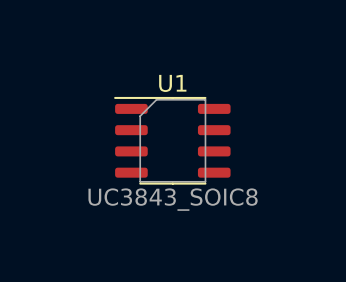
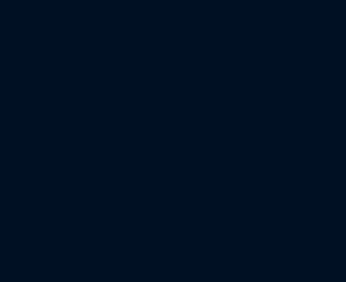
U1: UC3843_SOIC8 (172, 140) -> none

